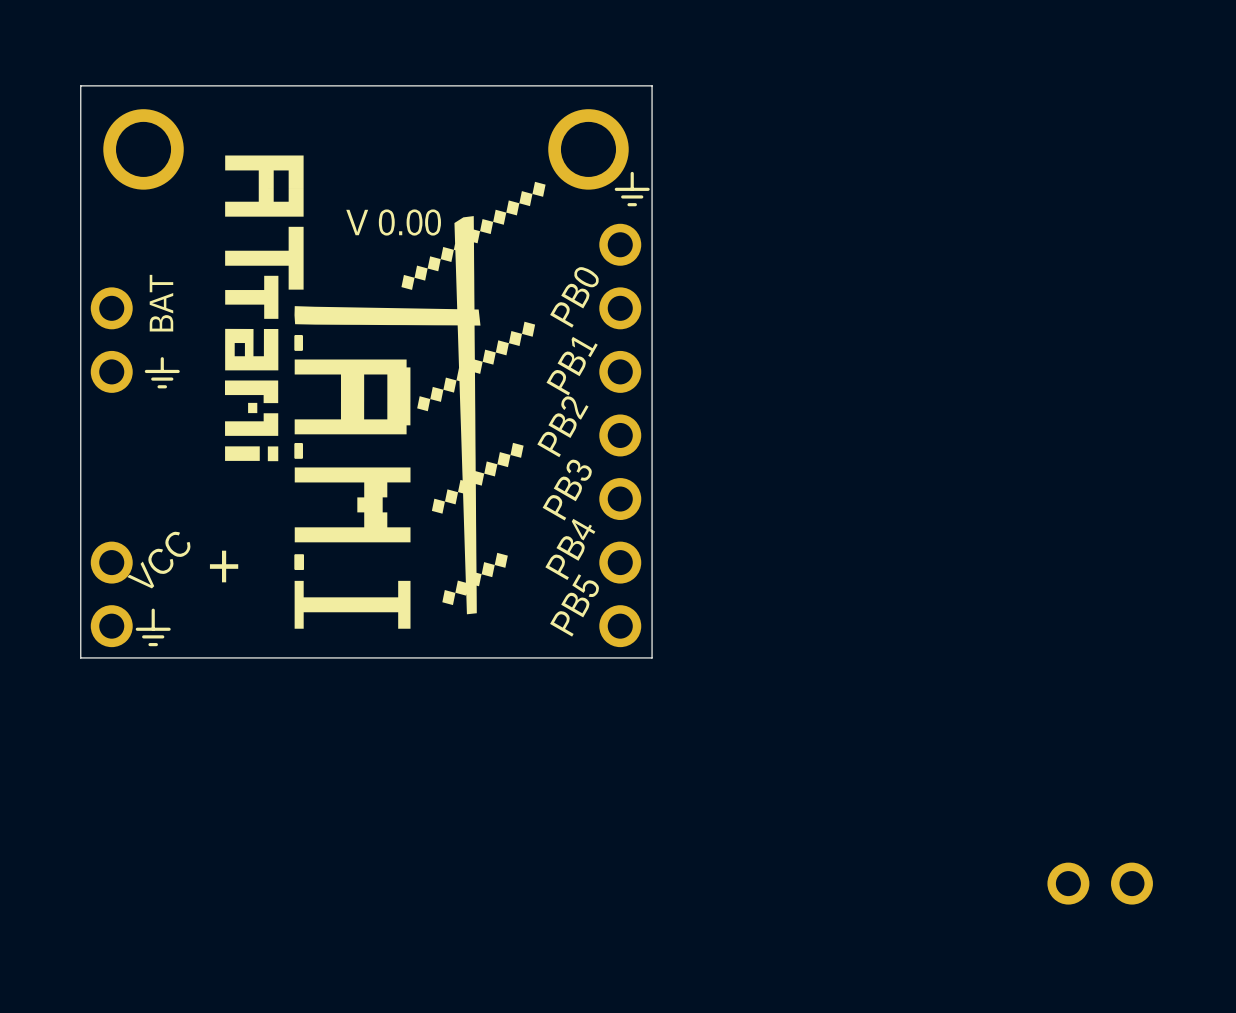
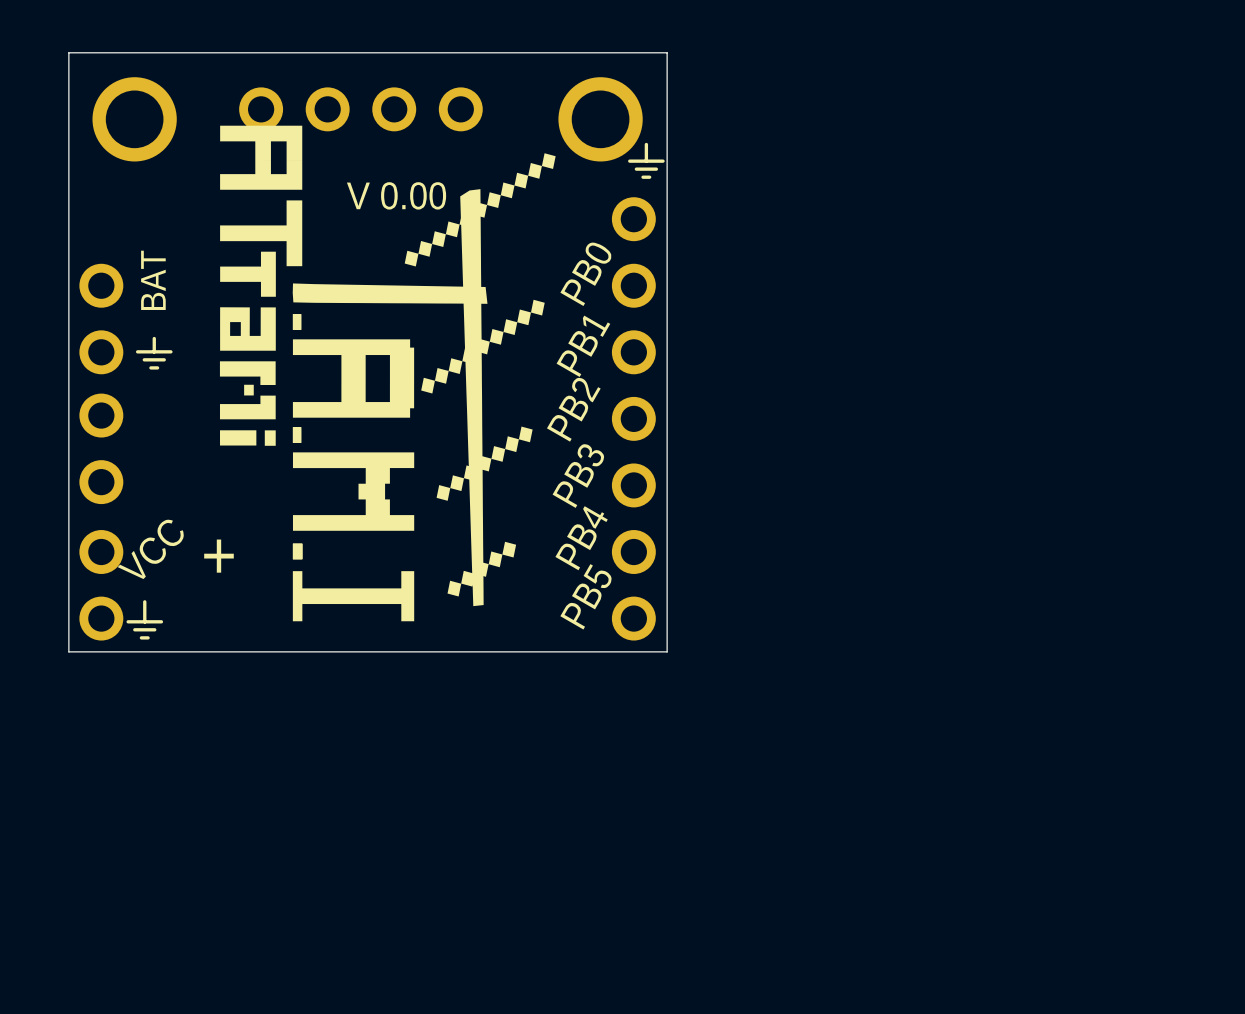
part: none -> (360, 109)
part: none -> (101, 448)
part: (1100, 883) -> none

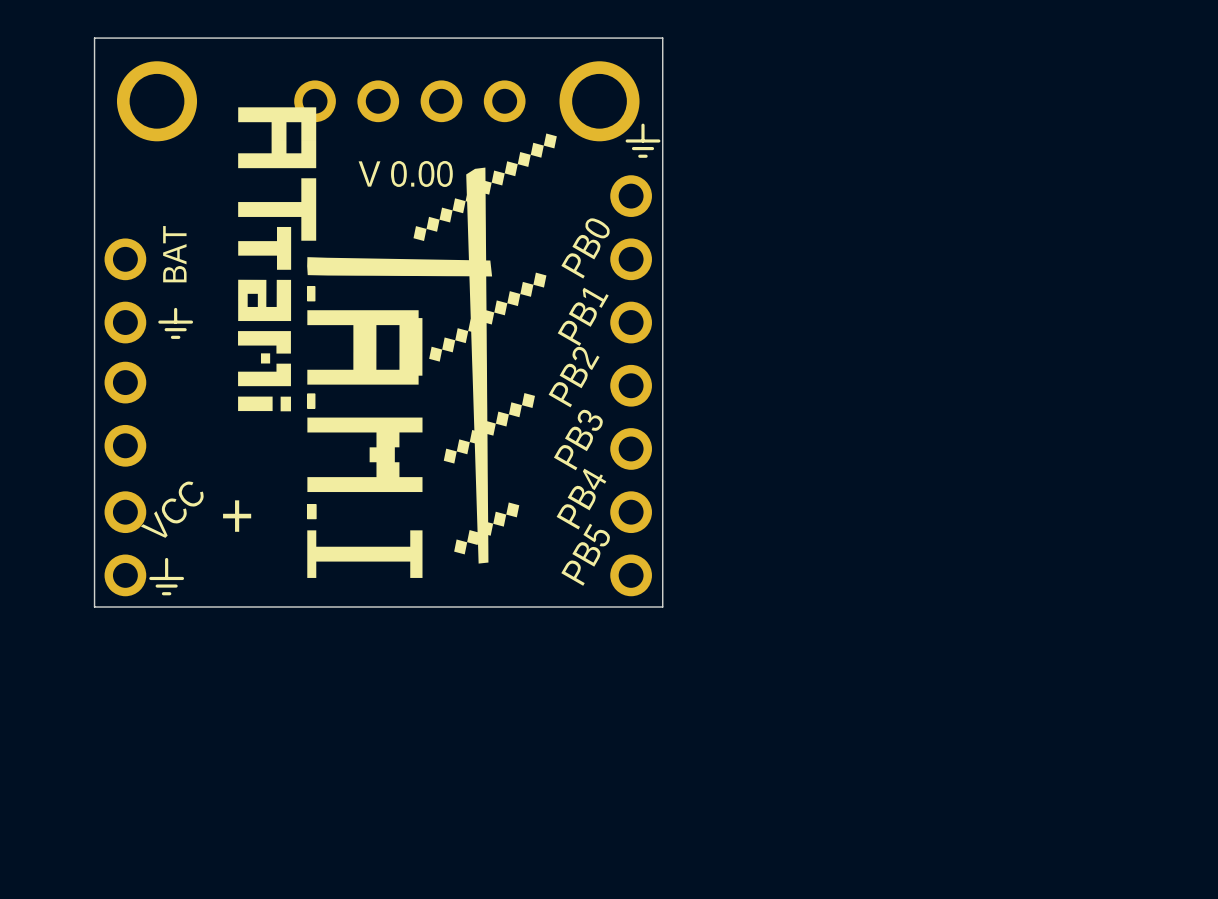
part position: (360, 109) -> (409, 101)

